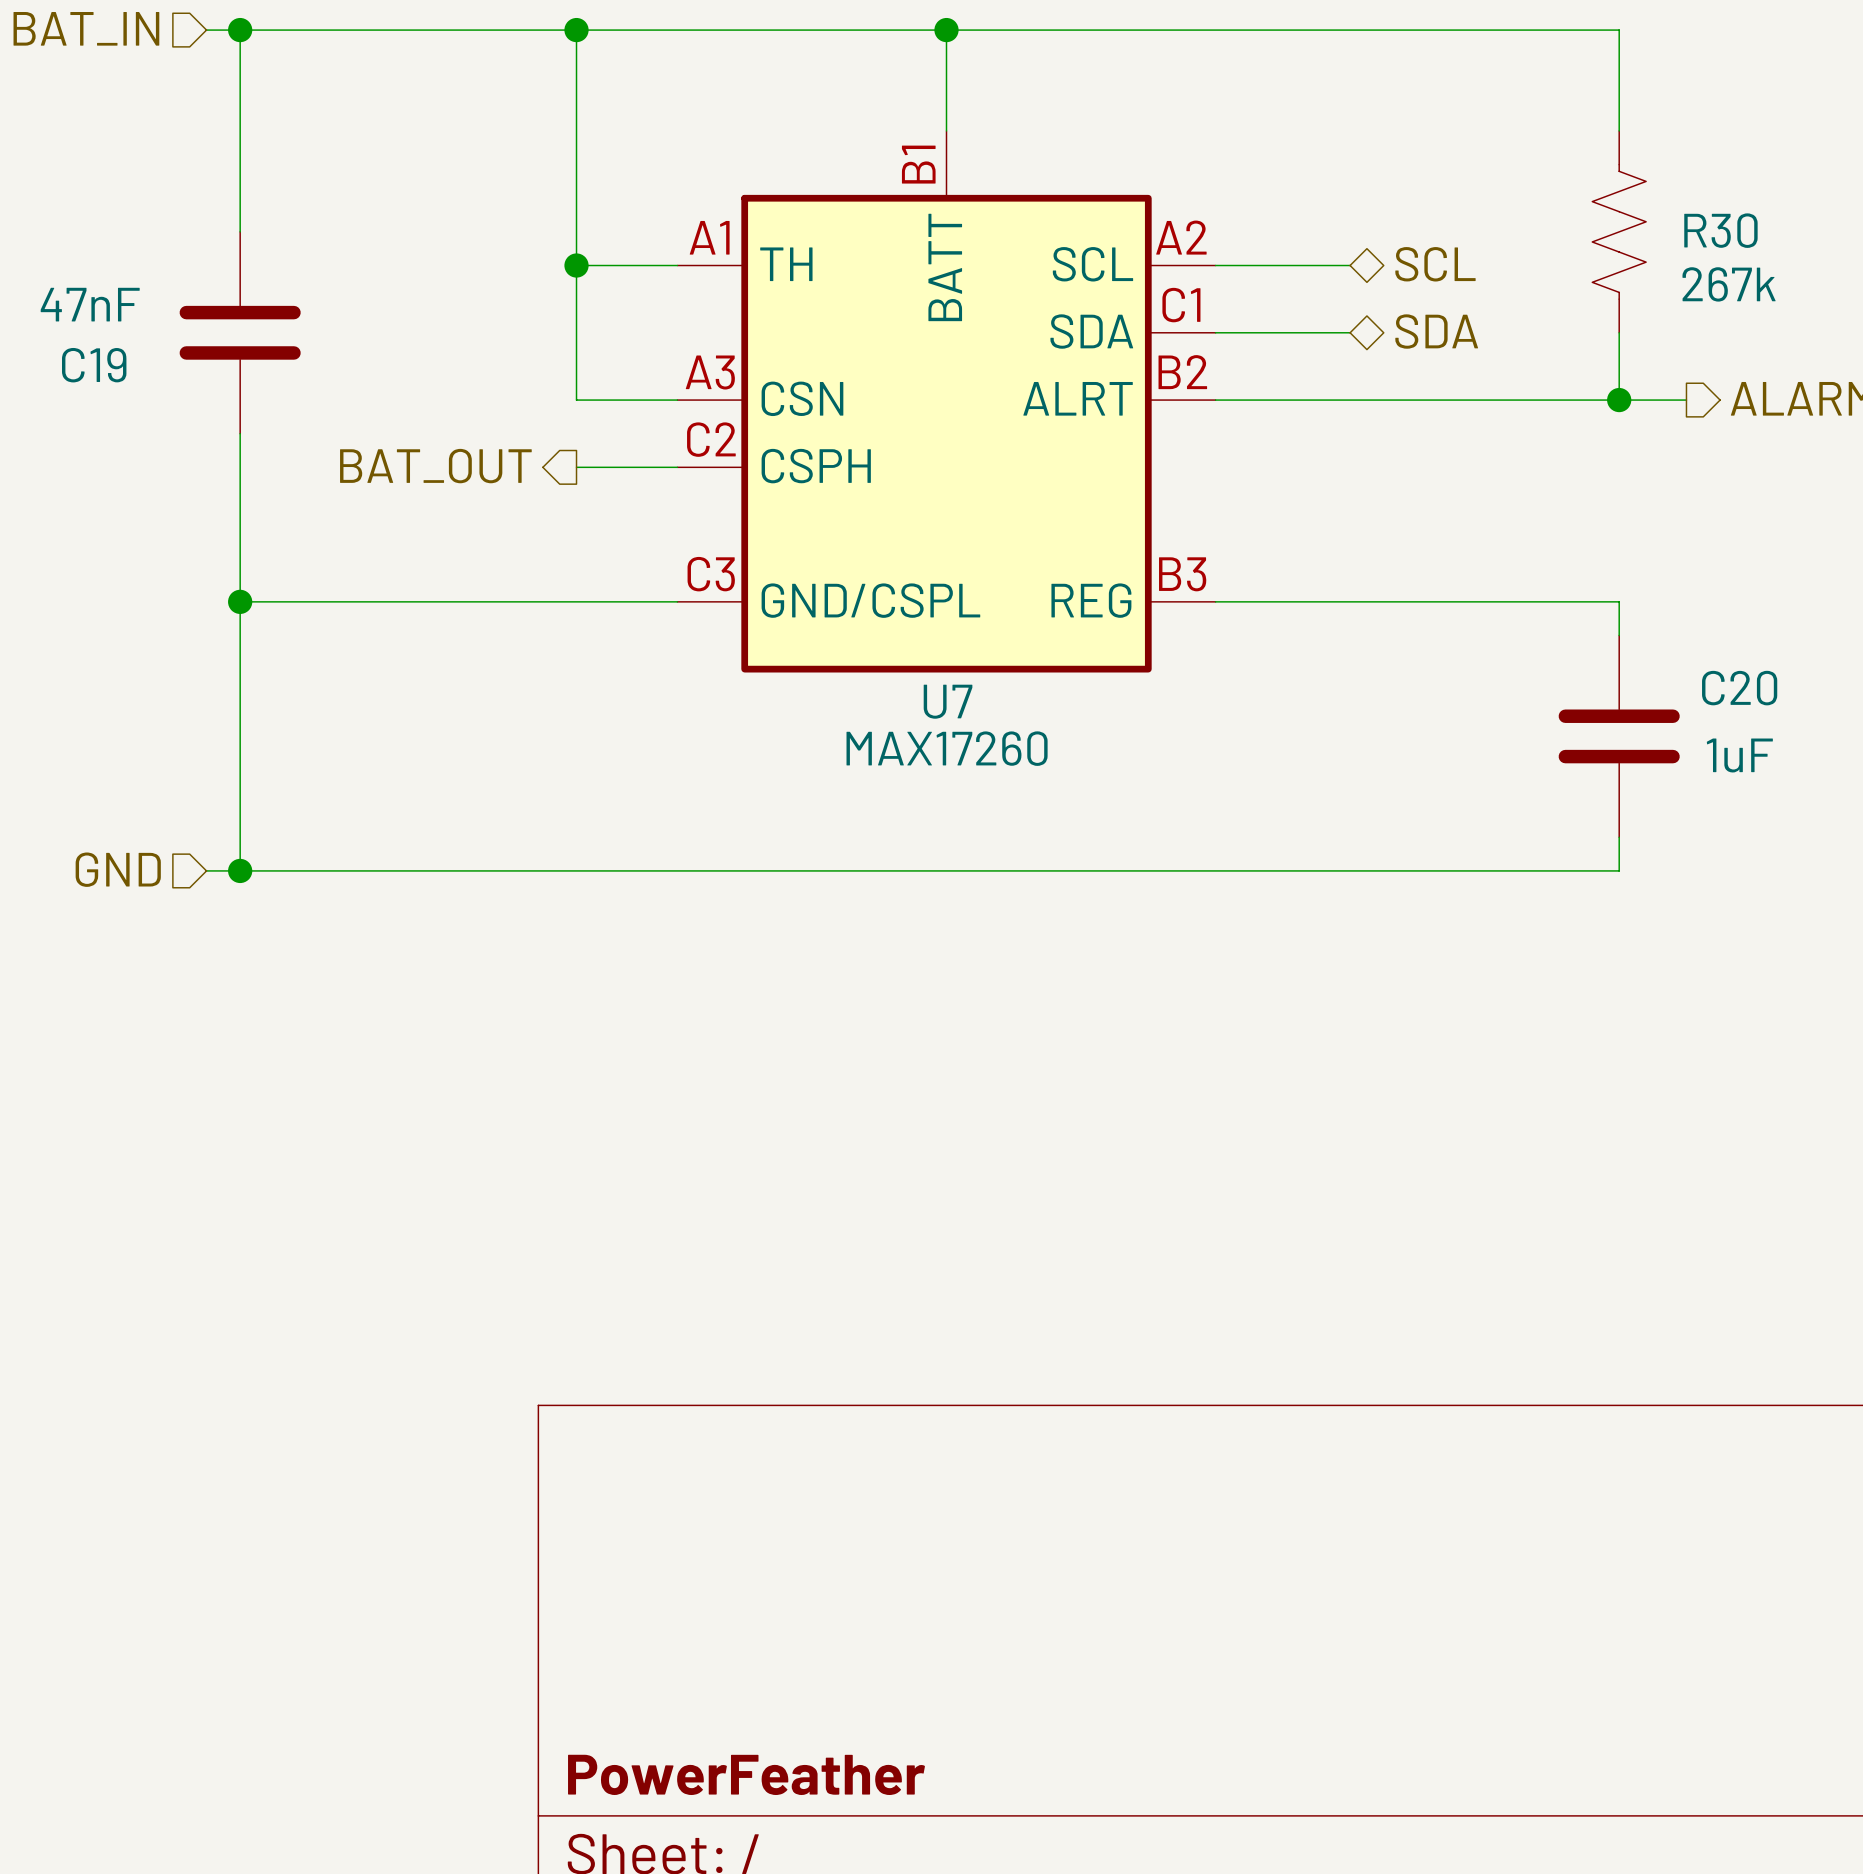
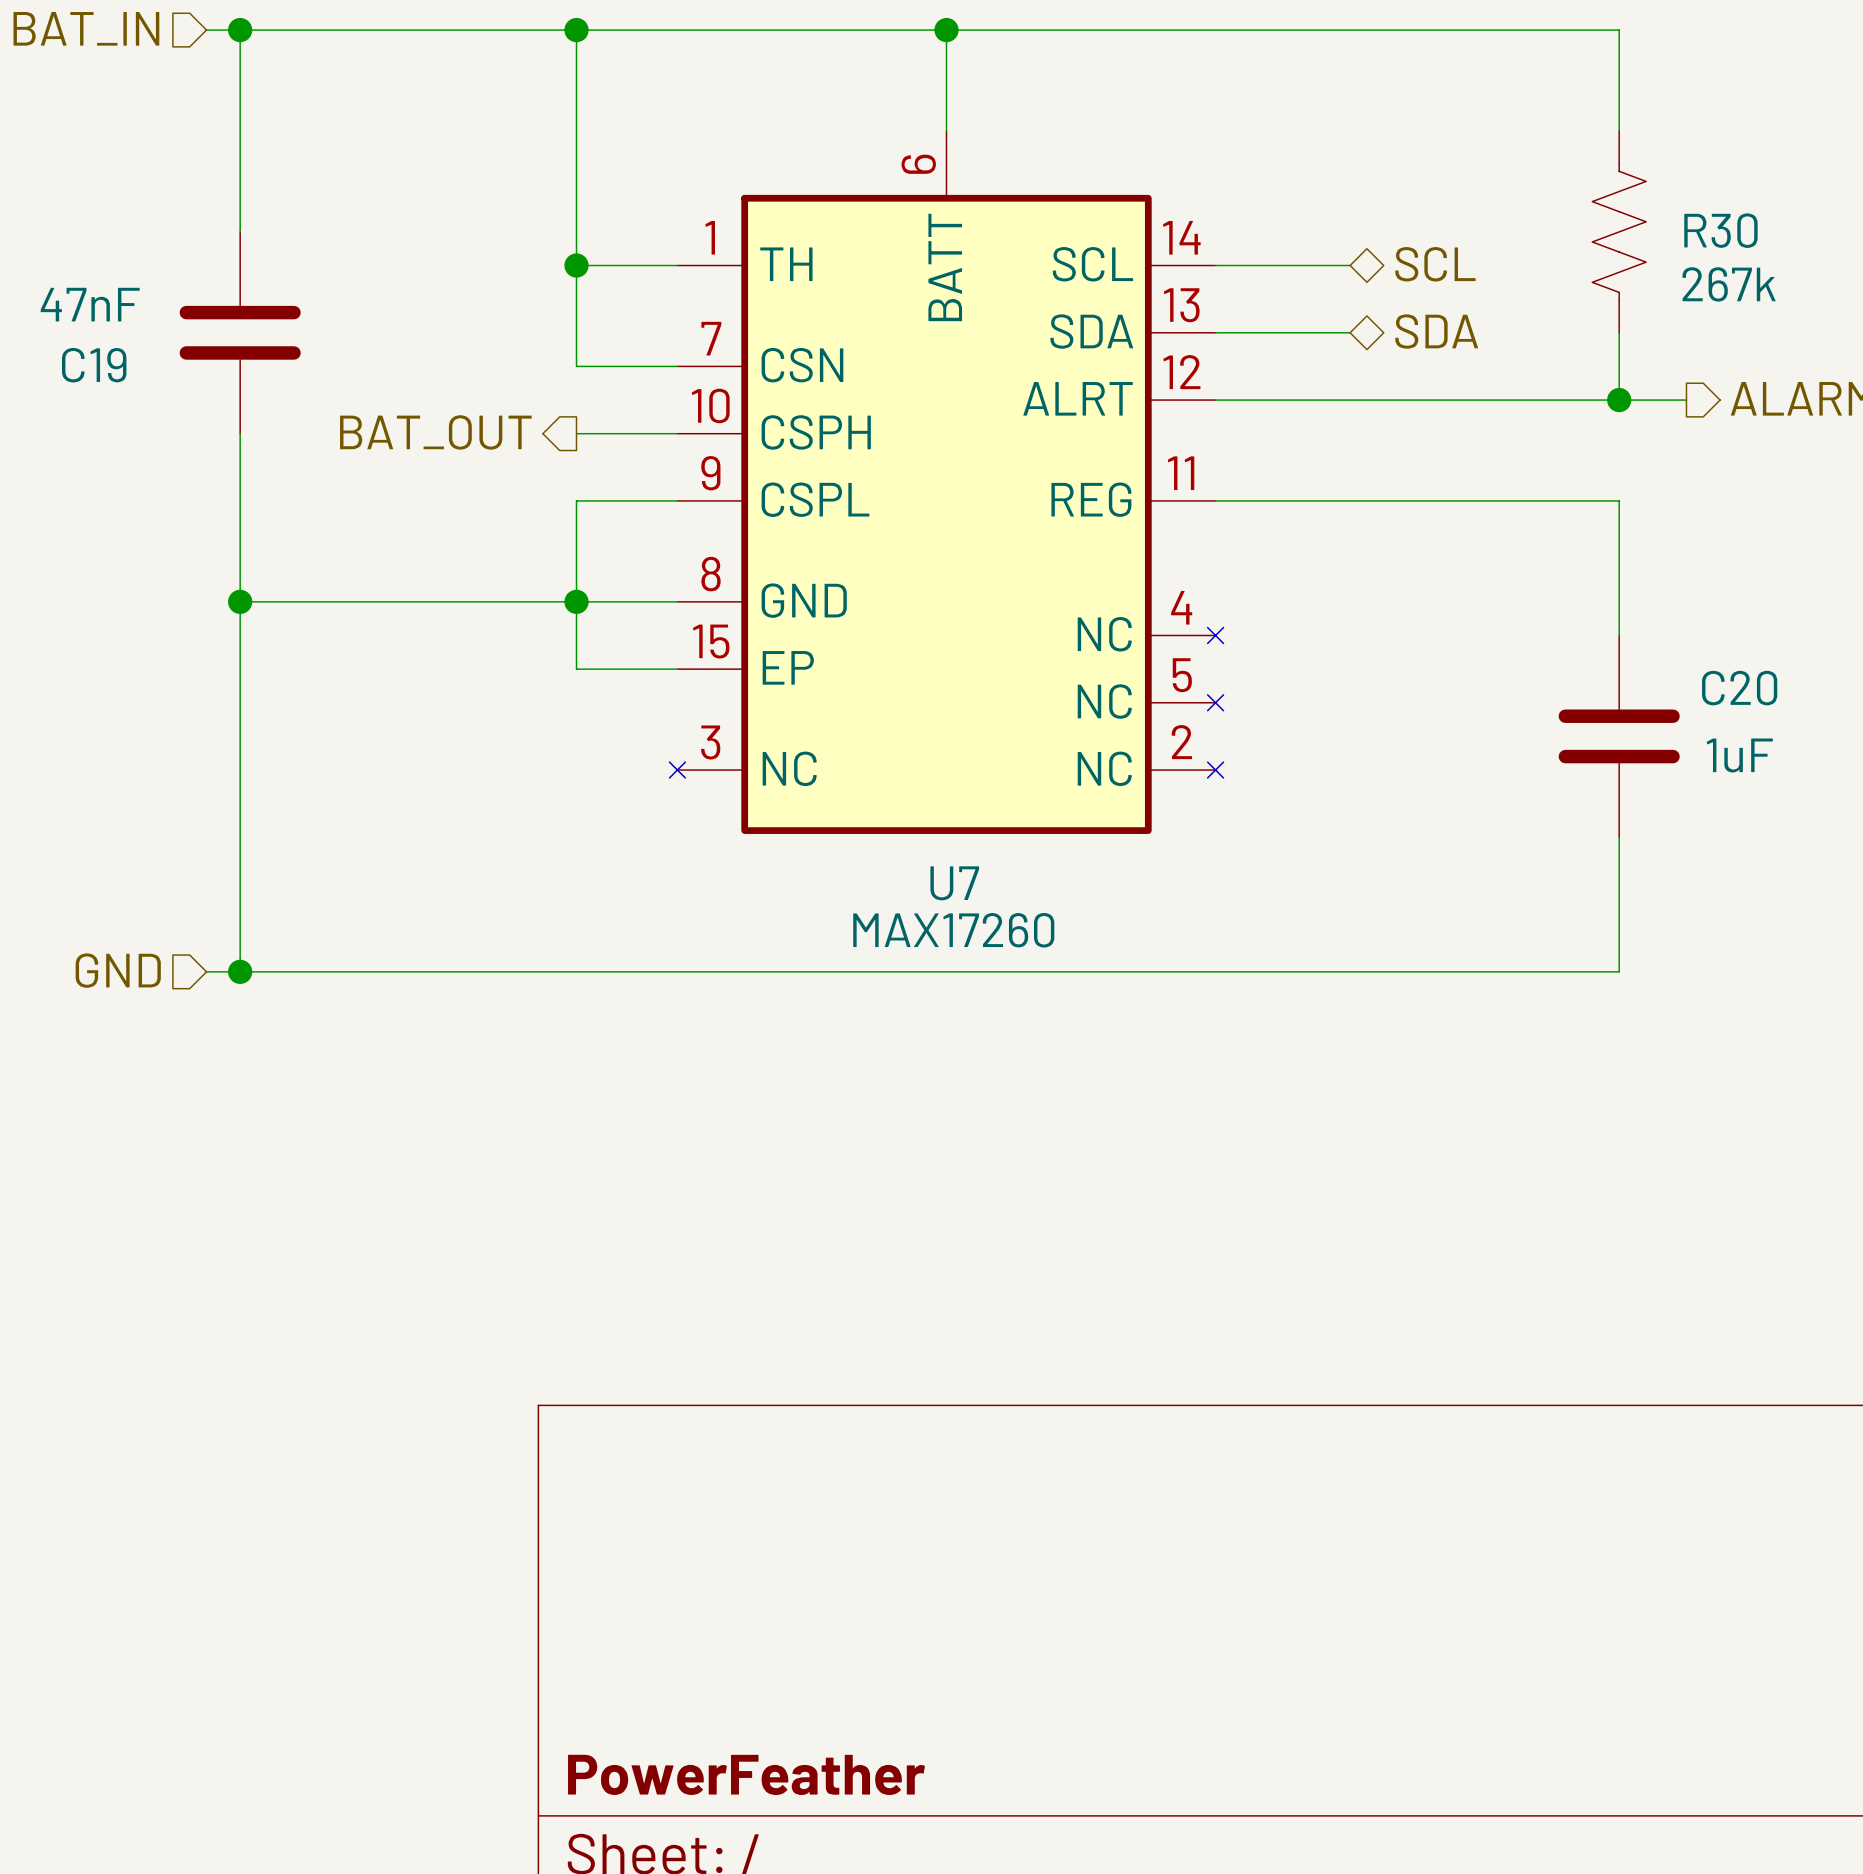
U7 symbol: [677, 130, 1216, 673] -> [669, 130, 1224, 834]
wire: (576, 366) (576, 400) (677, 400) -> (576, 366) (677, 366)
hierarchical label position: BAT_OUT (435, 466) -> BAT_OUT (435, 432)
wire: (576, 467) (677, 467) -> (576, 433) (677, 433)
wire: none -> (677, 500) (576, 500) (576, 669) (677, 669)
junction: none -> (576, 601)
wire: (1215, 601) (1619, 601) -> (1215, 500) (1619, 500) (1619, 601)
U7 name position: U7 (948, 701) -> U7 (954, 883)
U7 value position: MAX17260 (947, 748) -> MAX17260 (953, 930)
hierarchical label position: GND (118, 869) -> GND (118, 970)
wire: (206, 870) (1619, 870) -> (206, 971) (1619, 971) (1619, 870)
wire: none -> (240, 870) (240, 971)
junction position: (240, 870) -> (240, 971)

